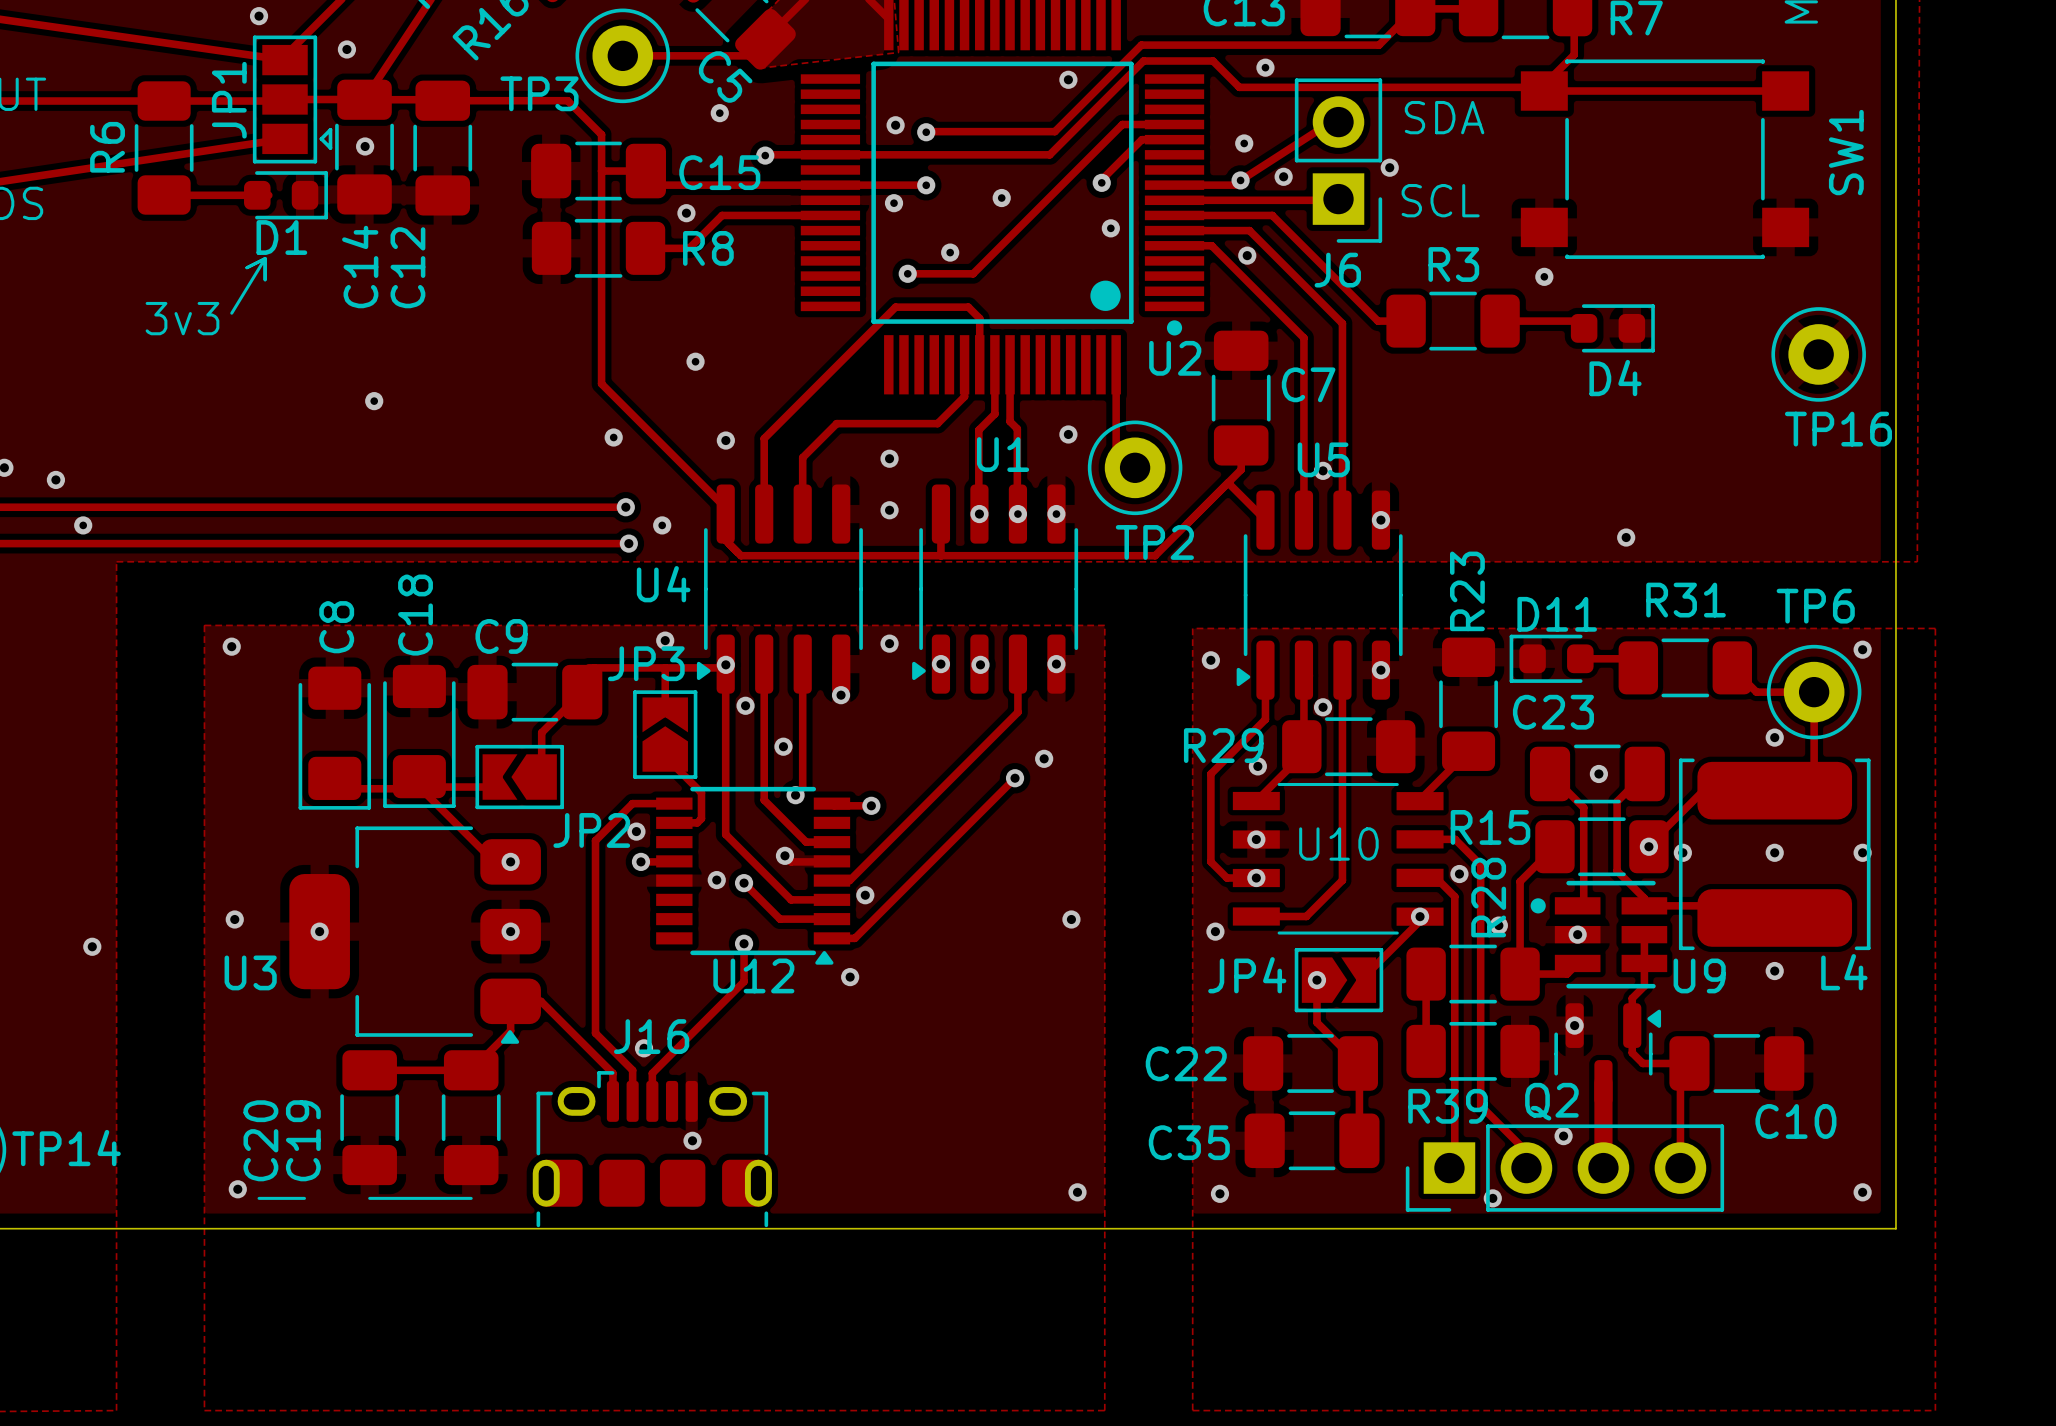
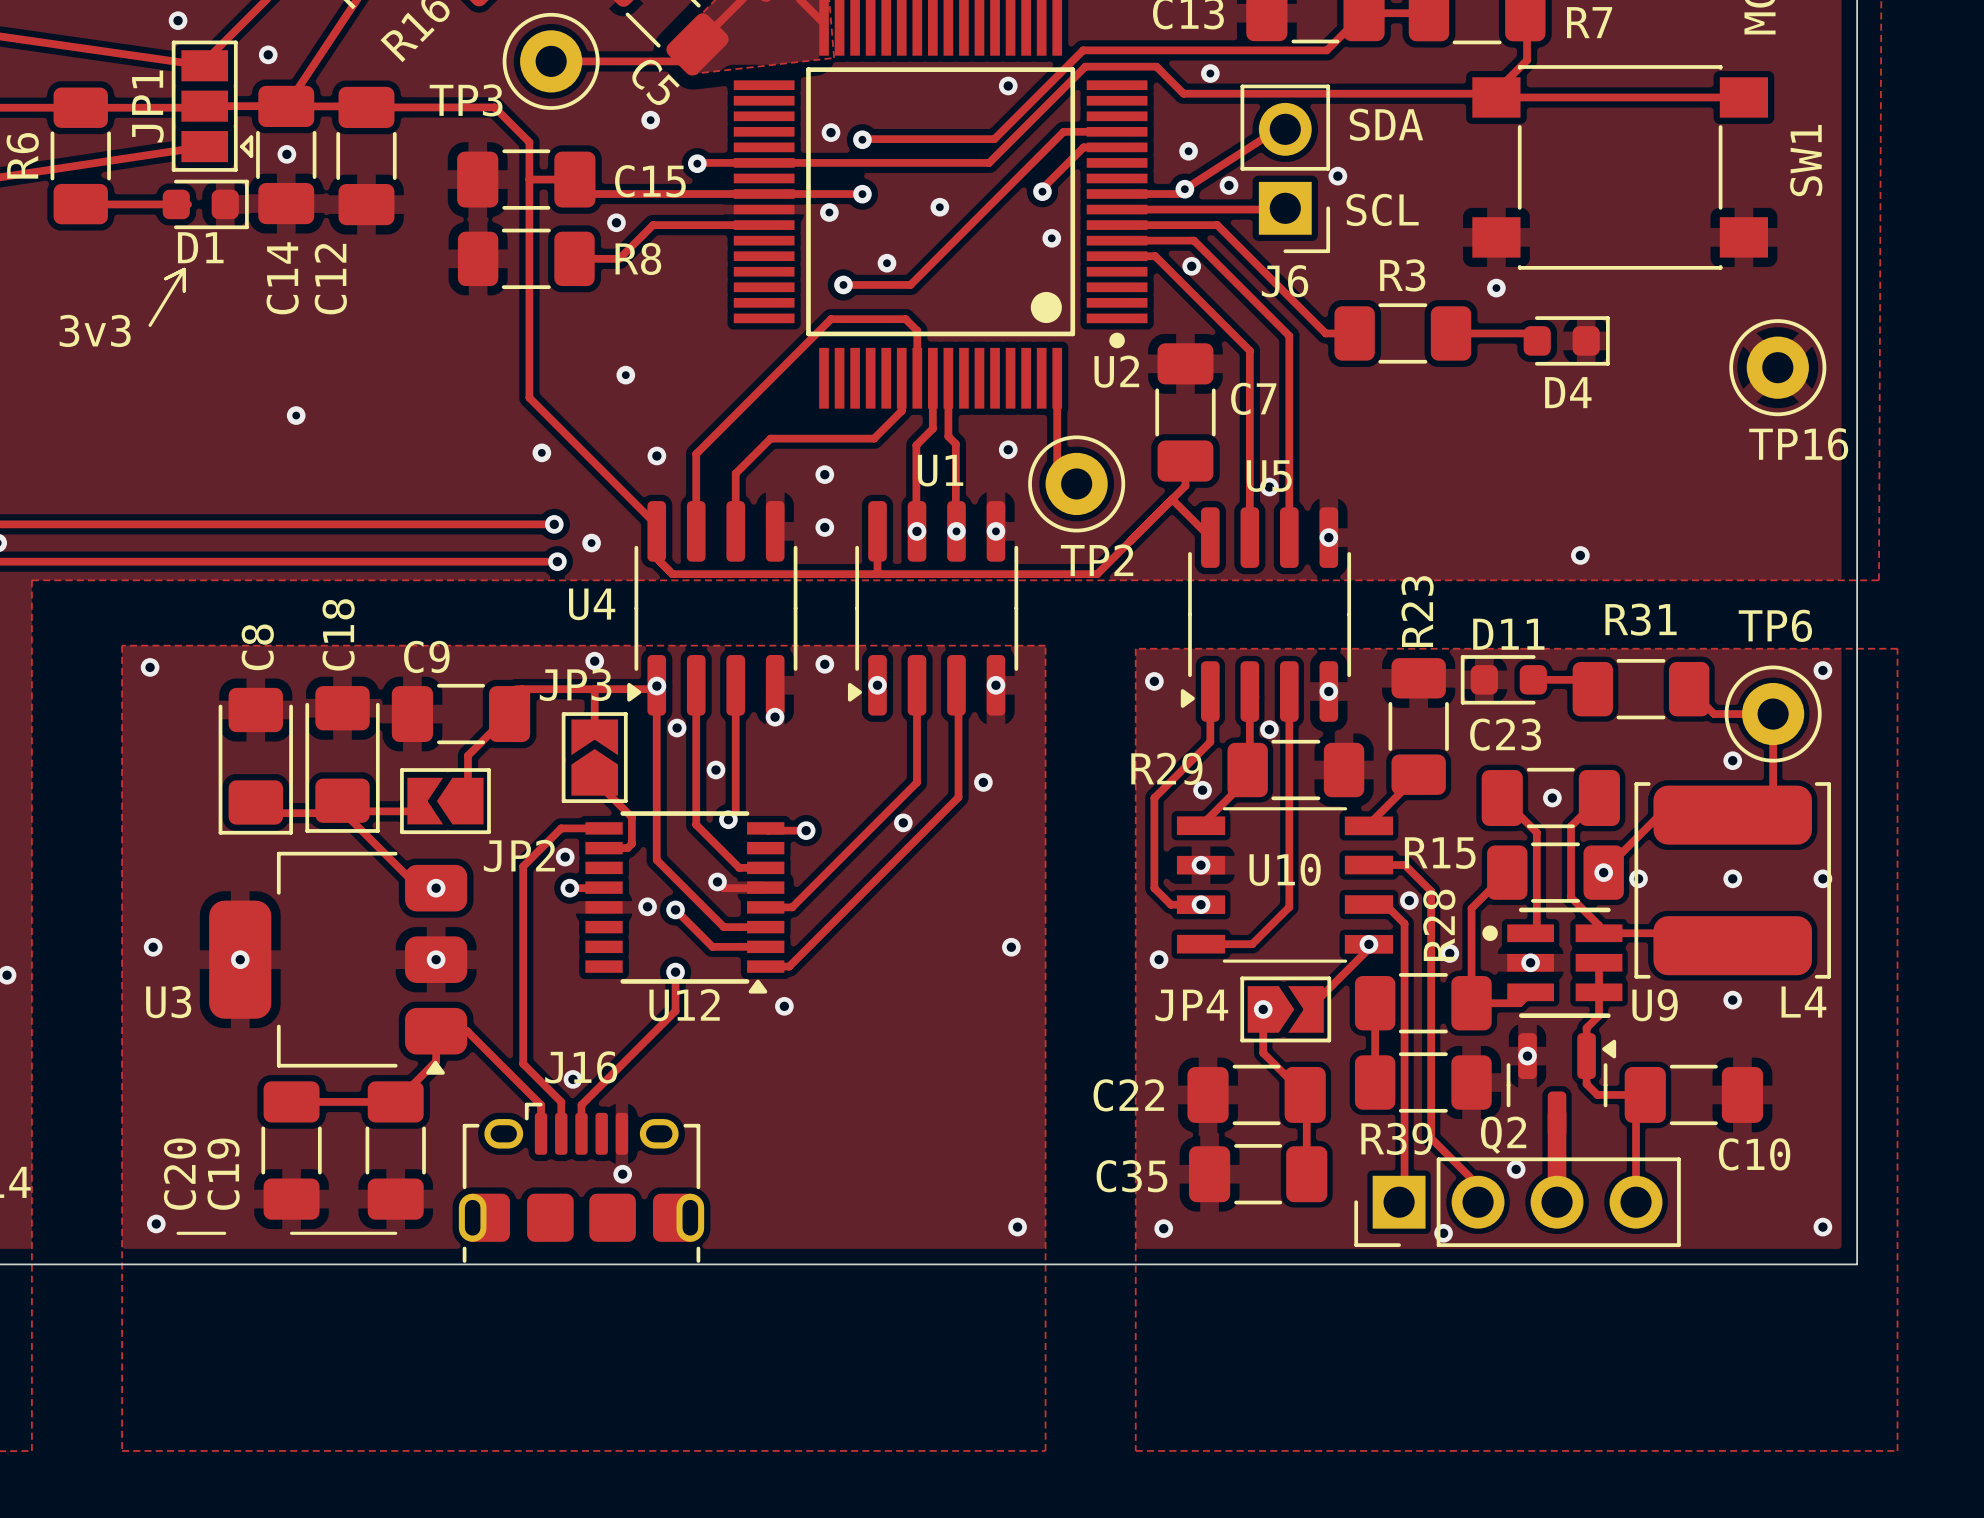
via: (980, 664) -> none
track: (1017, 671) (1017, 712) (849, 880) -> (916, 685) (916, 782) (792, 907) (783, 907)
track: none -> (956, 692) (958, 694) (958, 797) (953, 802)
via position: (1015, 778) -> (903, 822)
via: (865, 895) -> none

